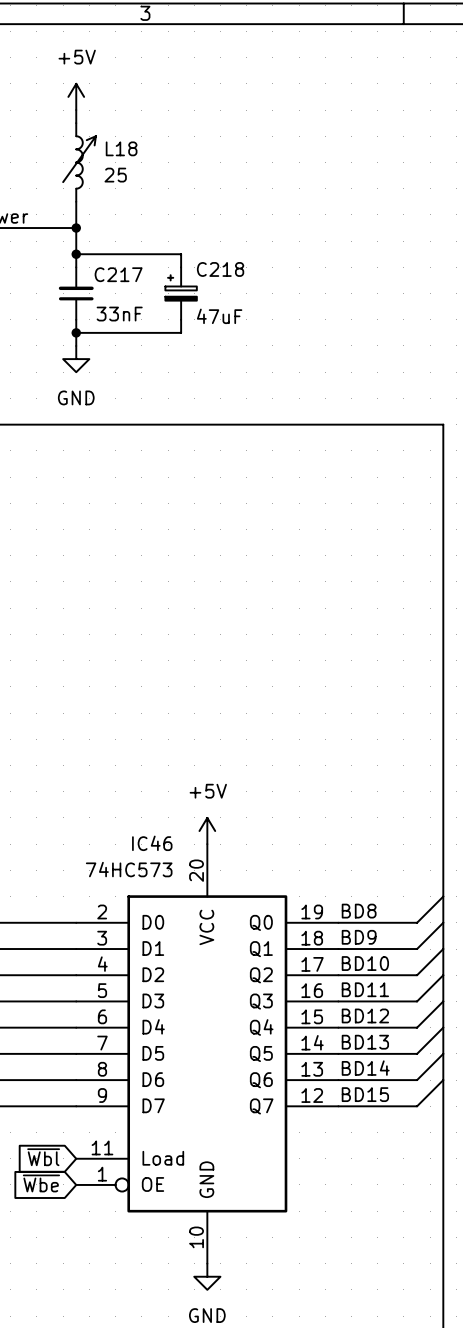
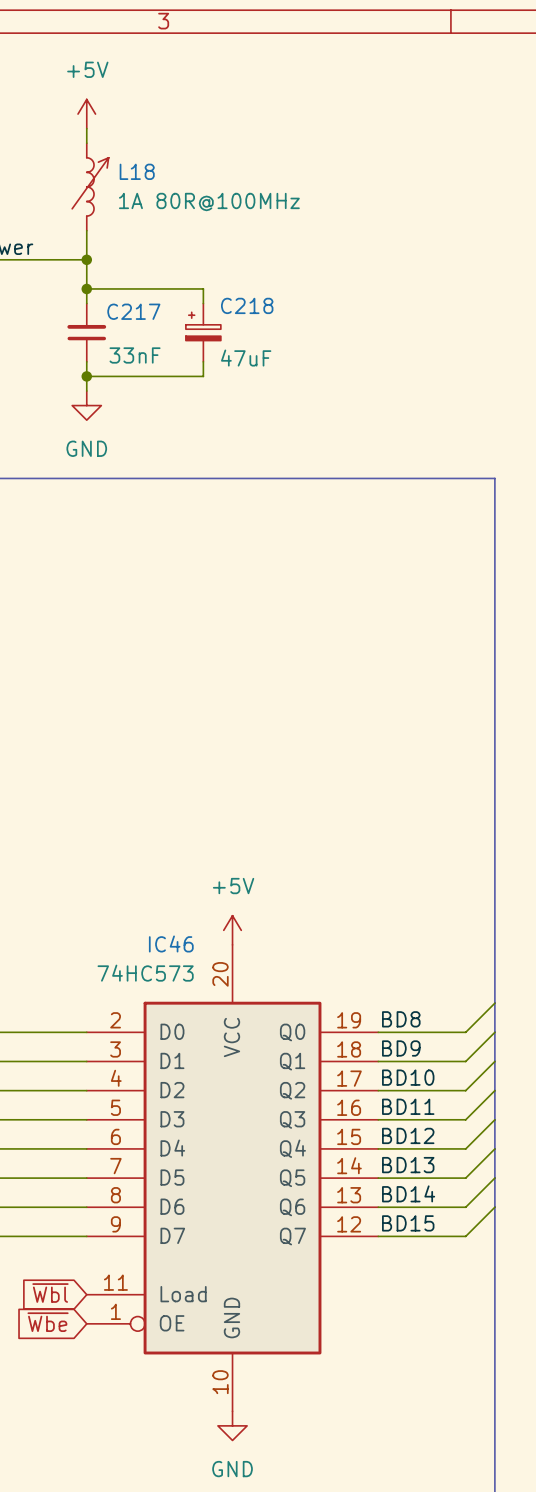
L18 value: 25 (115, 175) -> 1A 80R@100MHz (209, 202)

